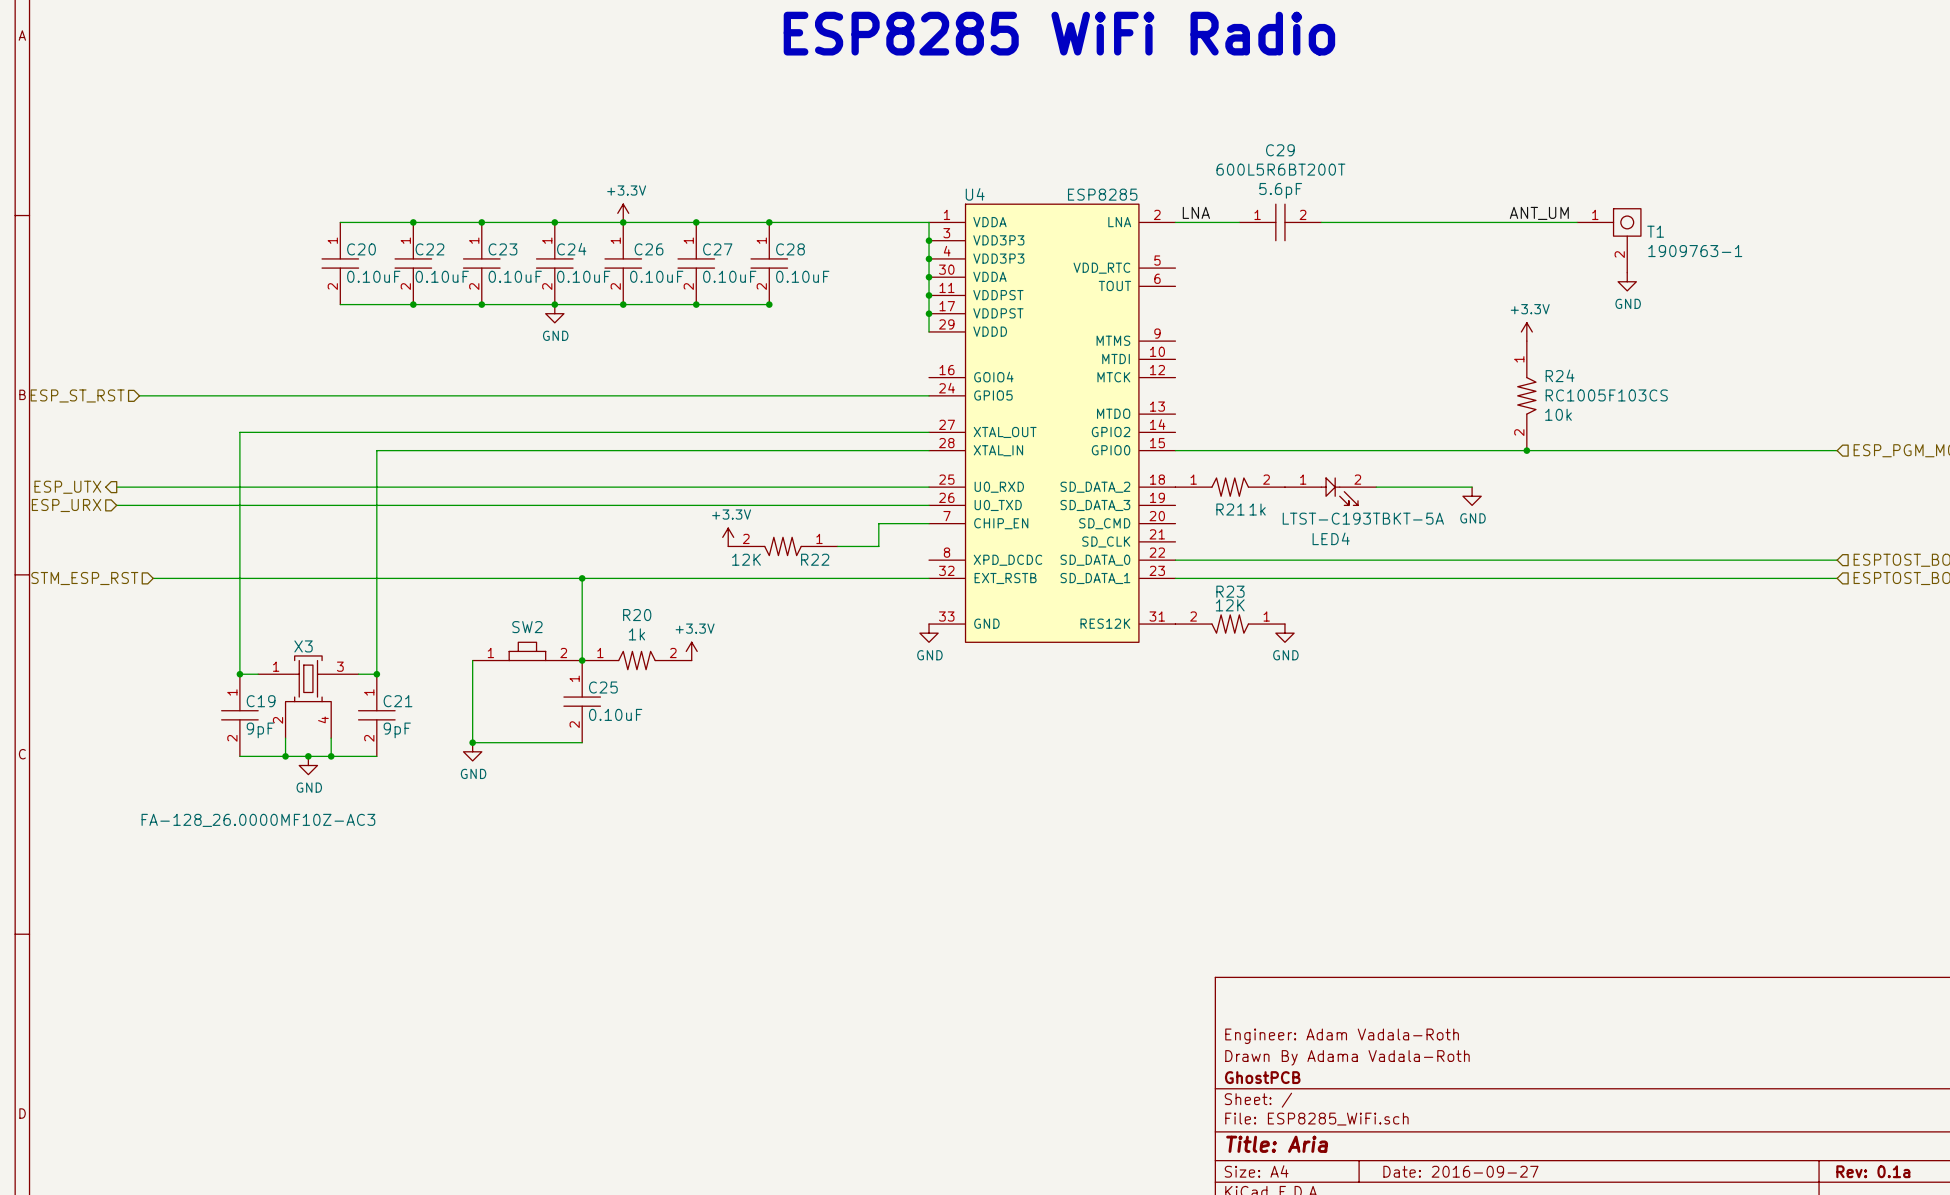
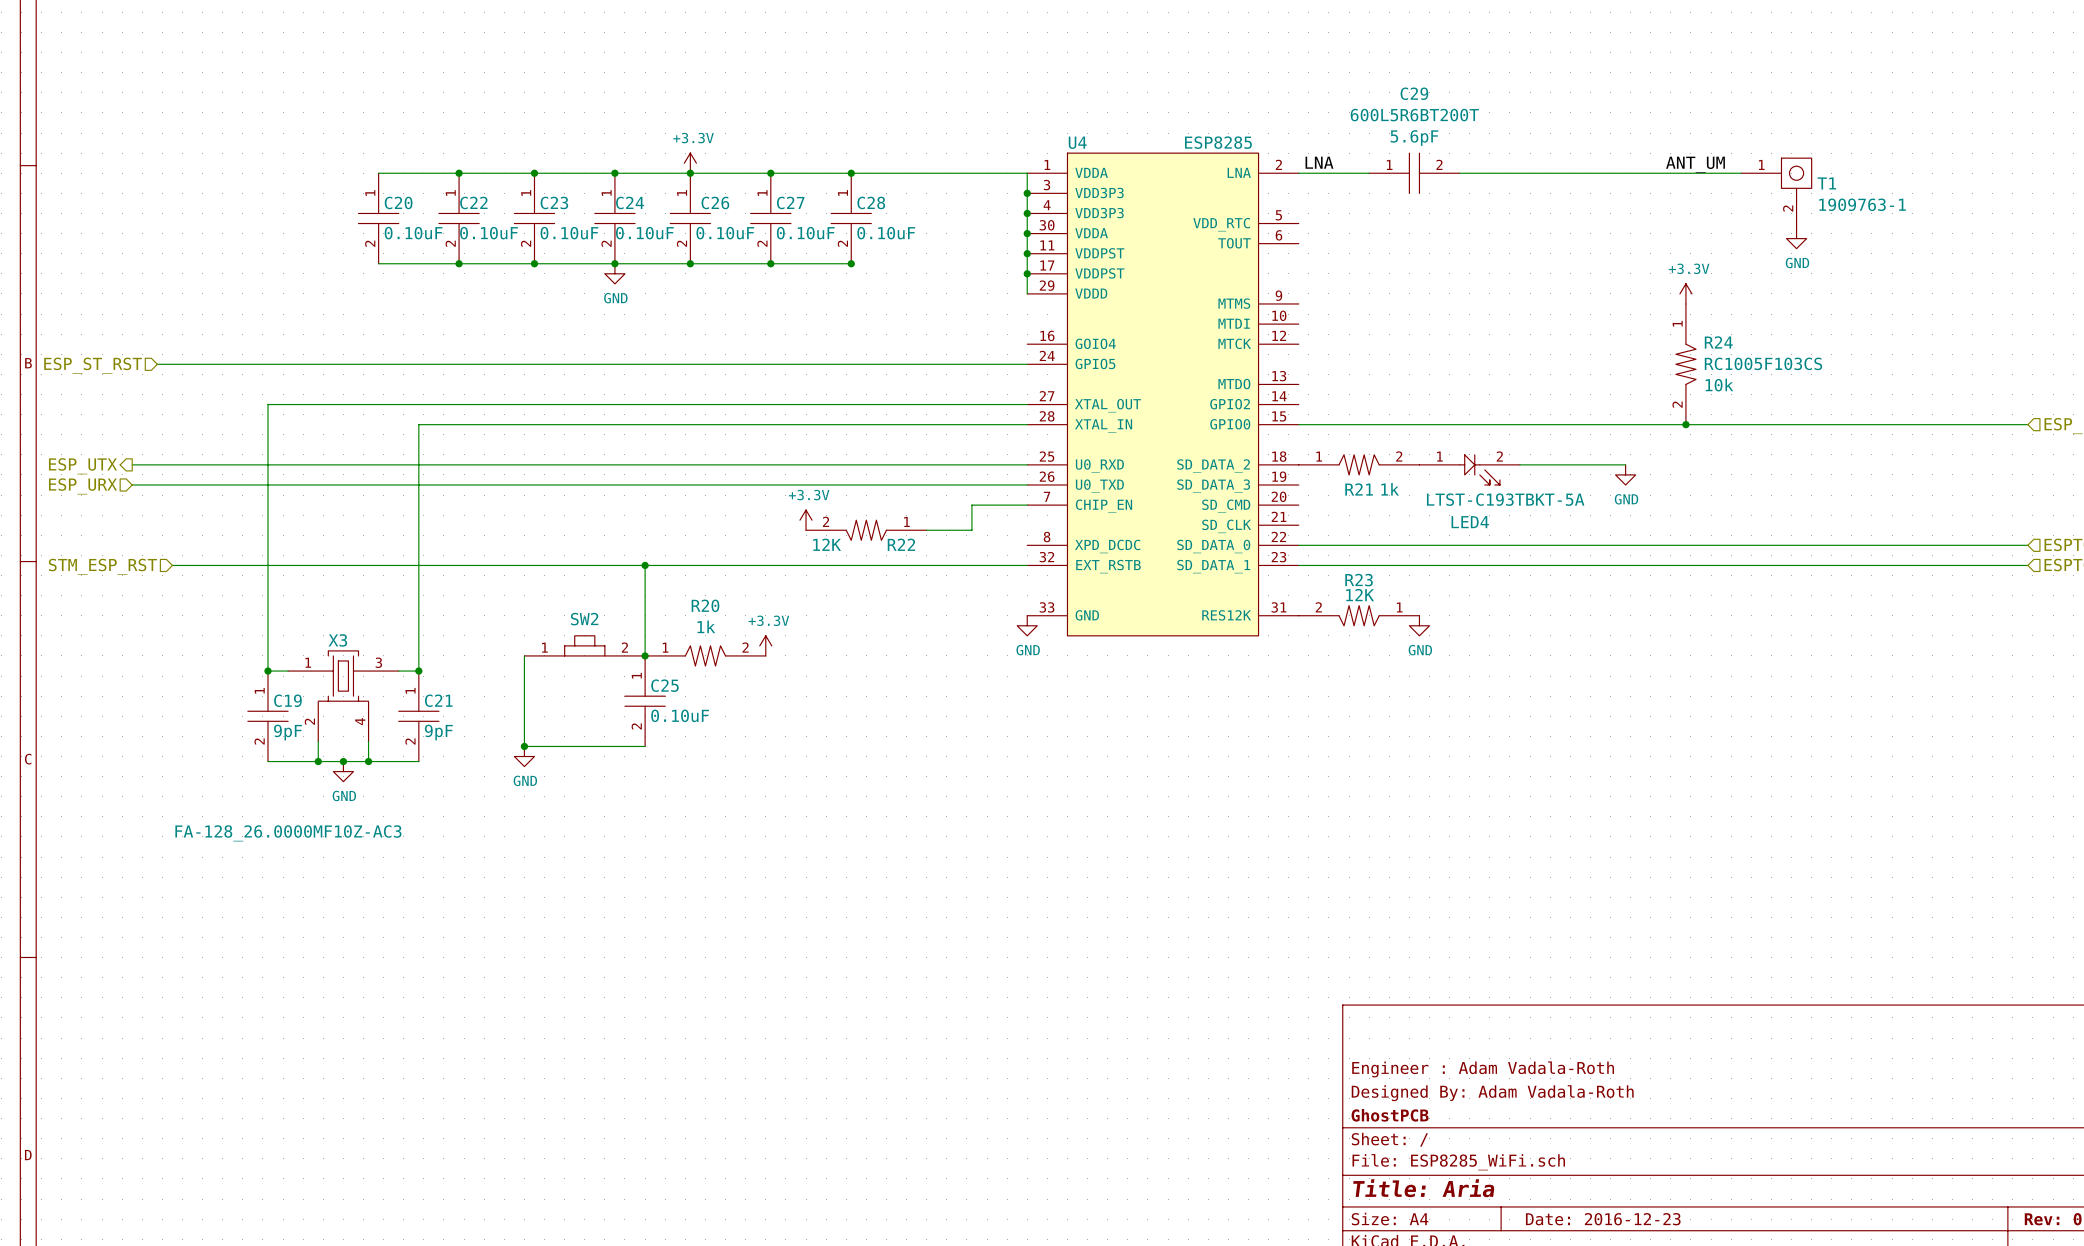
title block: Engineer: Adam Vadala-Roth (1342, 1036) -> Engineer : Adam Vadala-Roth (1483, 1069)
title block: Drawn By Adama Vadala-Roth (1347, 1057) -> Designed By: Adam Vadala-Roth (1492, 1093)
title block: Date: 2016-09-27 (1460, 1171) -> Date: 2016-12-23 (1603, 1219)

